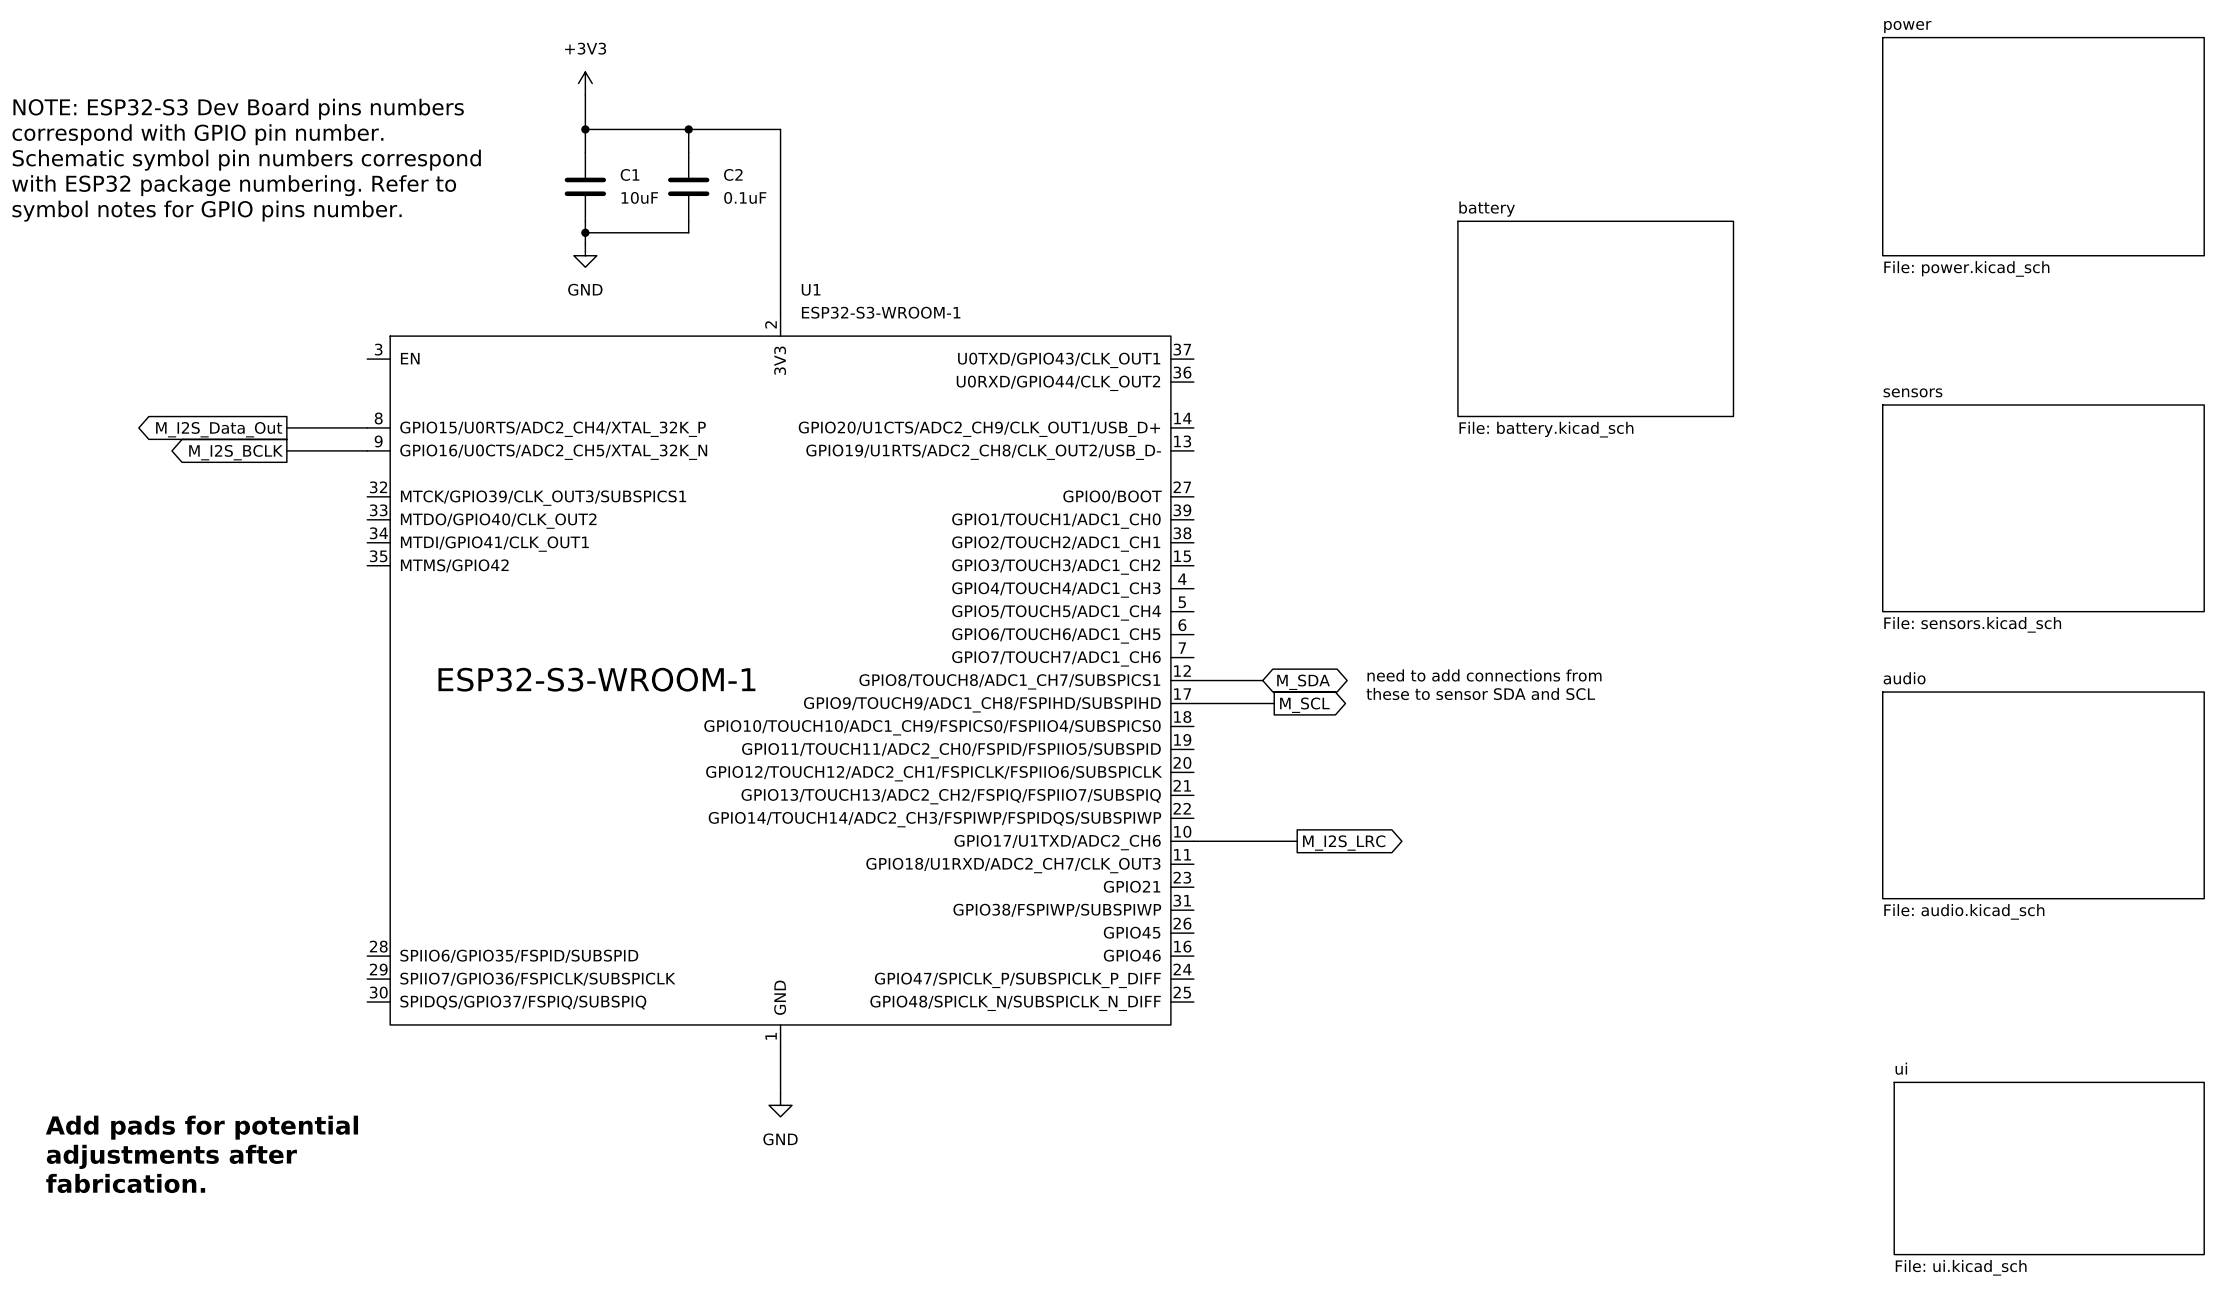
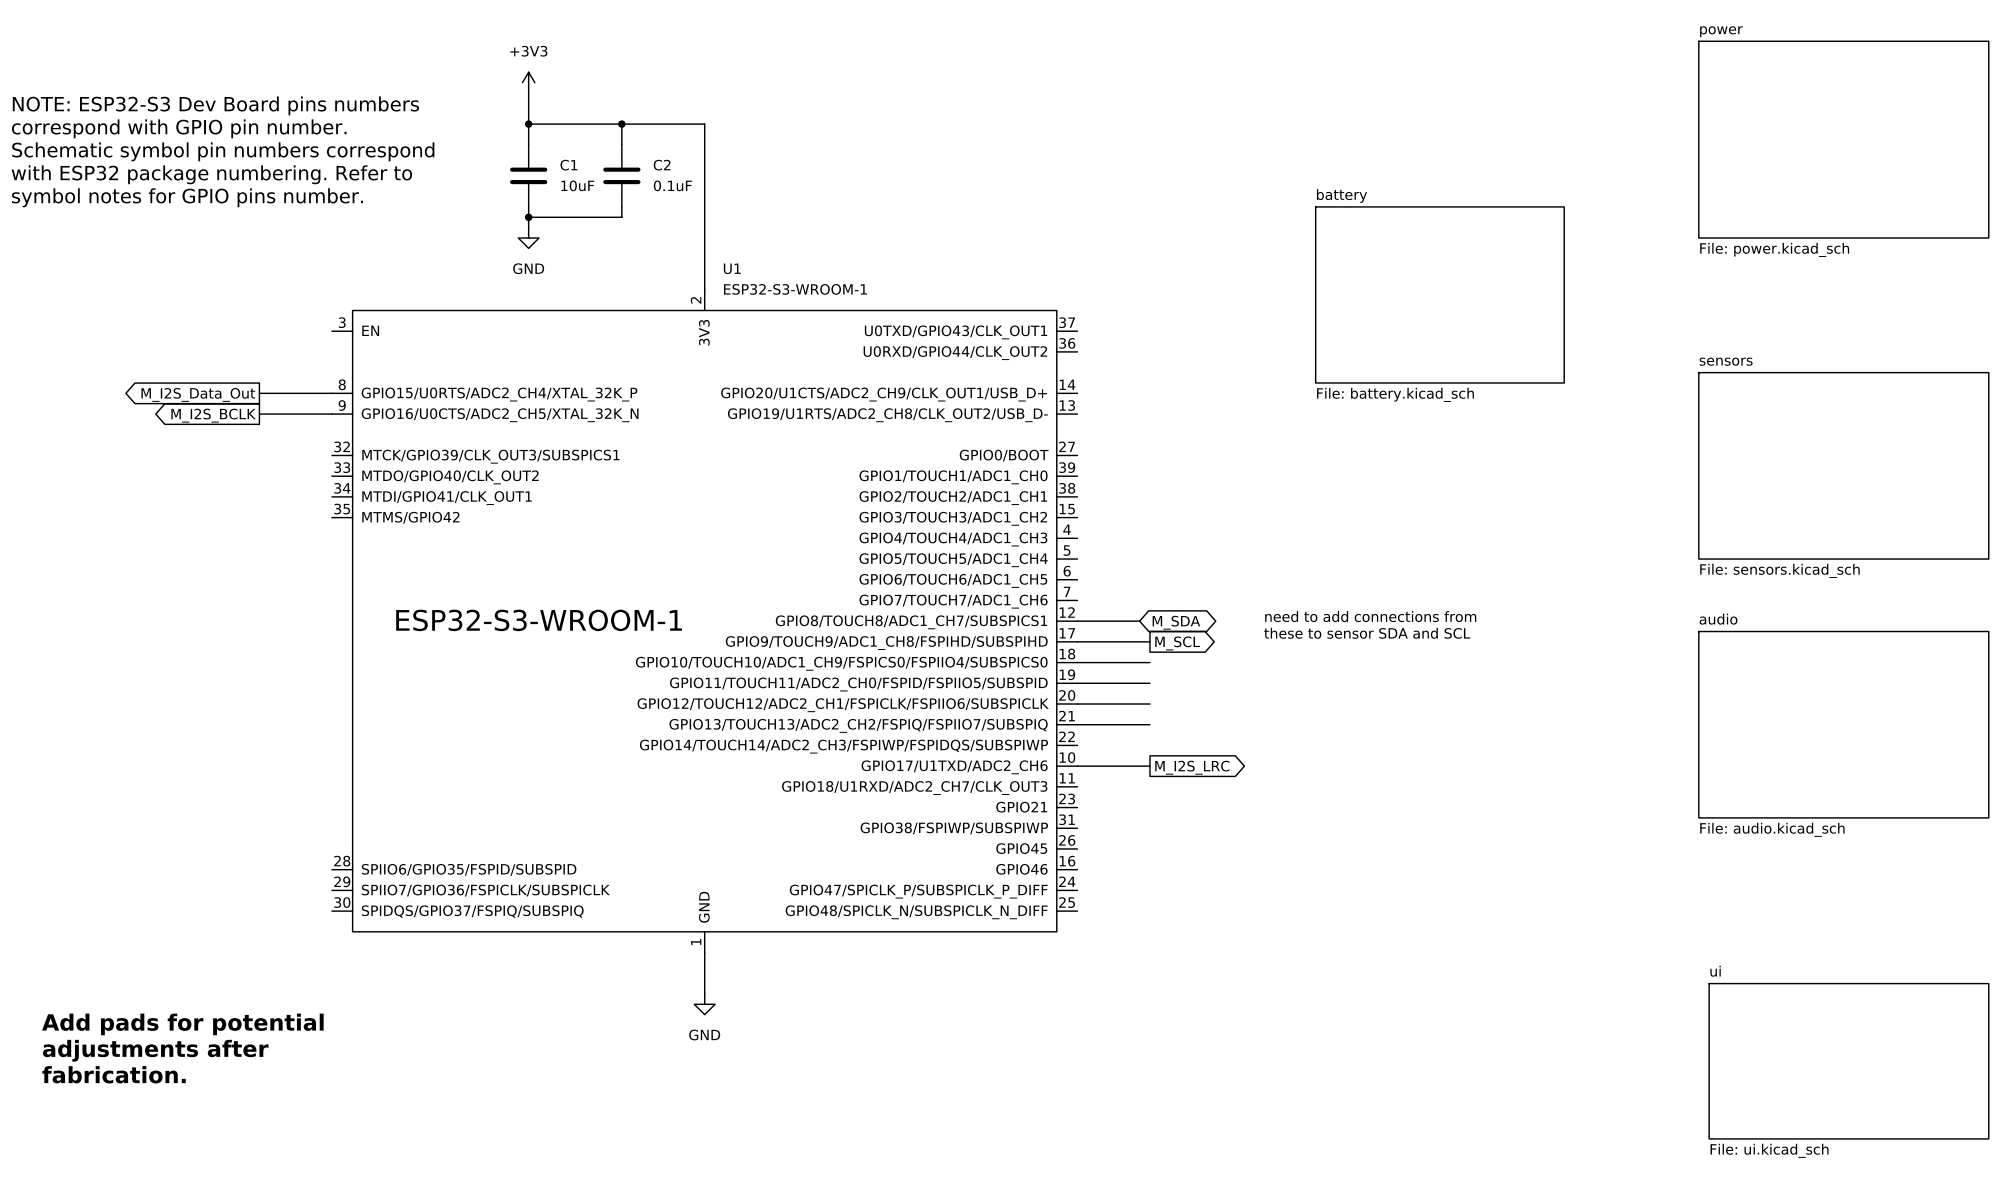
text position: need to add connections from (1484, 675) -> need to add connections from (1370, 616)
text position: these to sensor SDA and SCL (1480, 693) -> these to sensor SDA and SCL (1367, 633)
wire: none -> (1077, 662) (1149, 662)
wire: none -> (1077, 683) (1149, 683)
wire: none -> (1077, 704) (1149, 704)
wire: none -> (1077, 724) (1149, 724)
wire: (1274, 841) (1297, 841) -> none
global label position: M_I2S_LRC (1344, 843) -> M_I2S_LRC (1192, 767)

